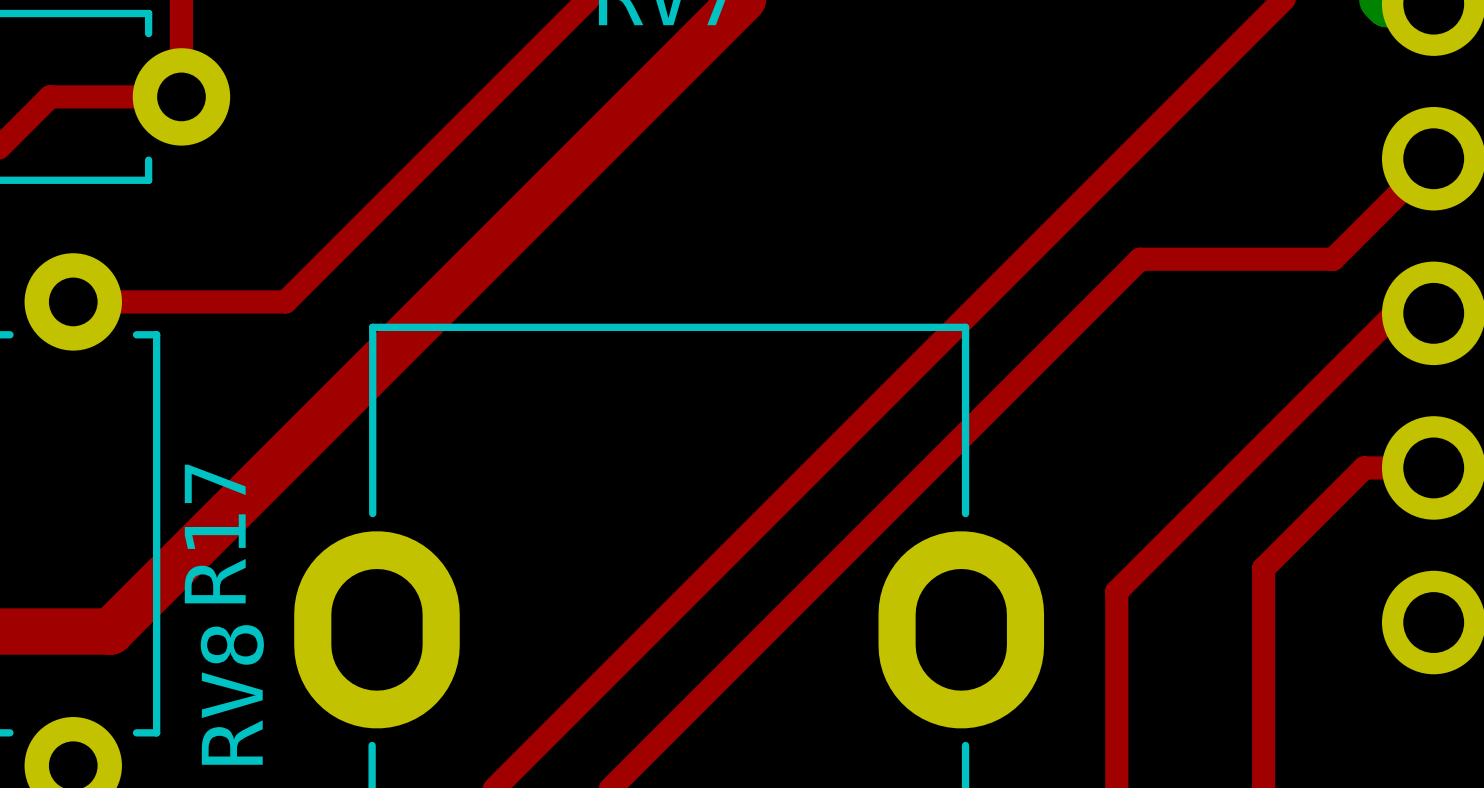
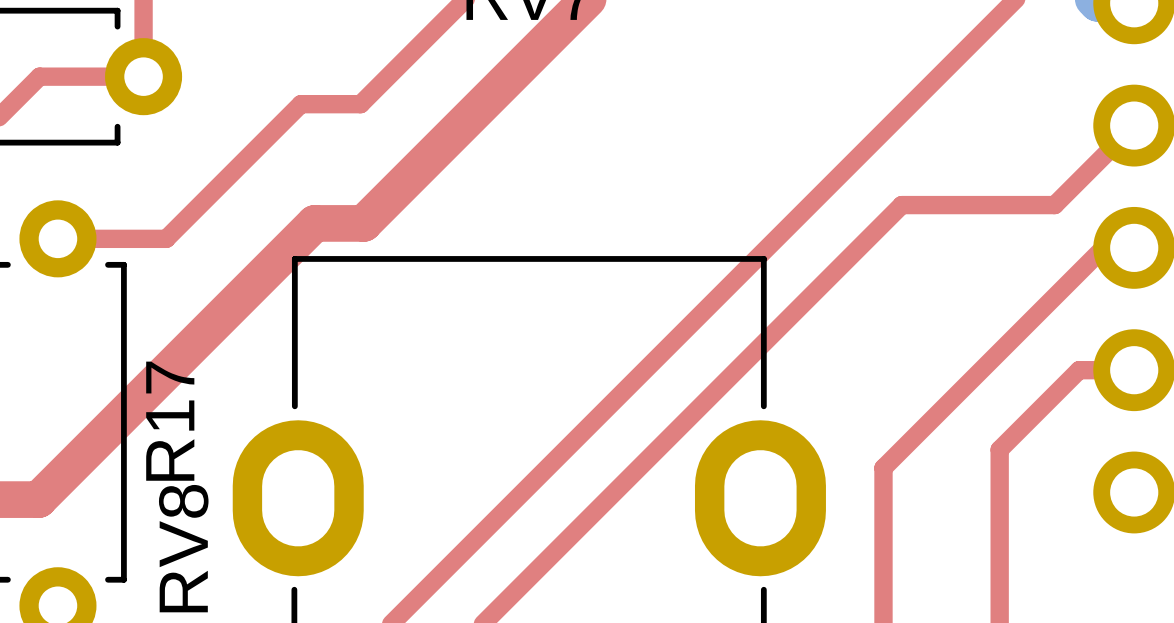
top track: (455, 131) (285, 301) (210, 301) -> (360, 104) (300, 104) (166, 238)
top track: (459, 282) (110, 631) (48, 631) -> (363, 223) (314, 223) (38, 499)

